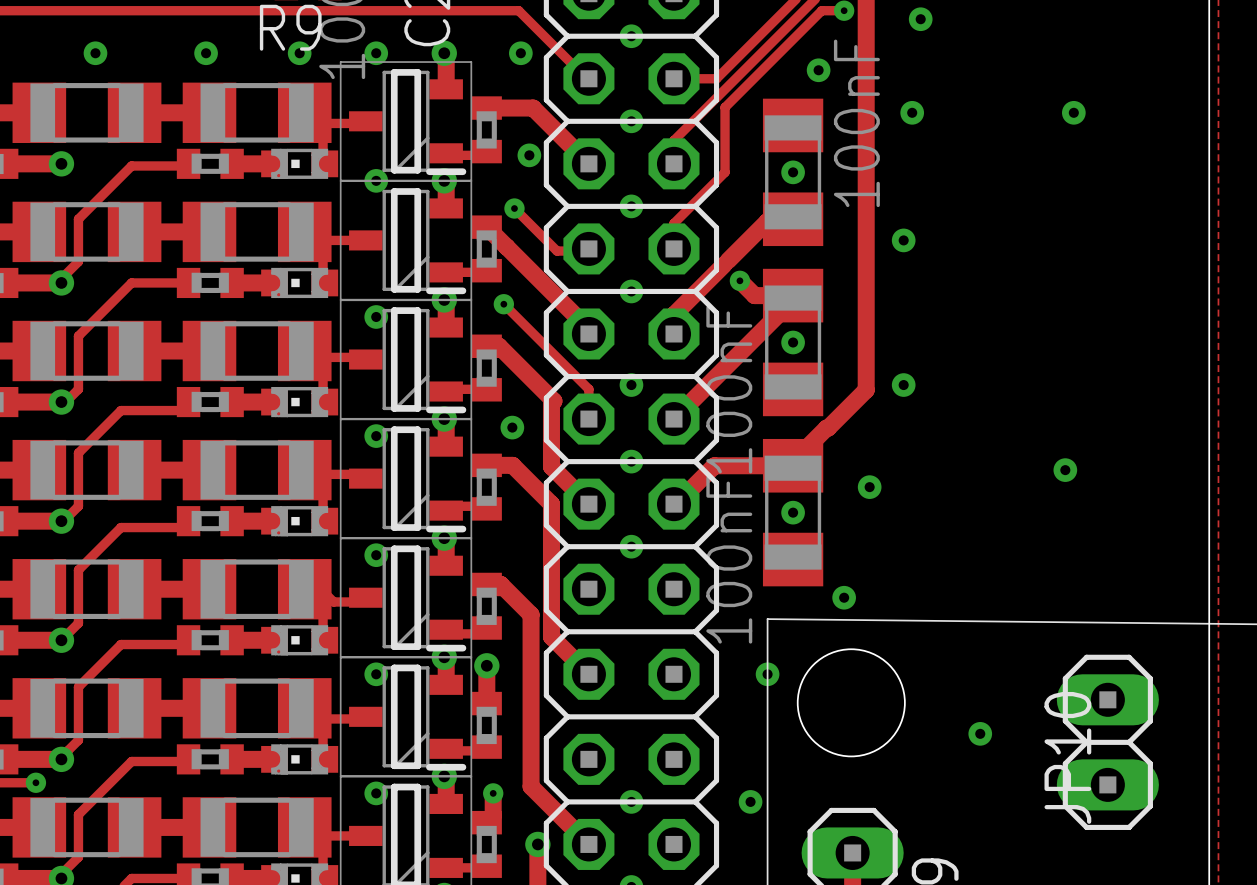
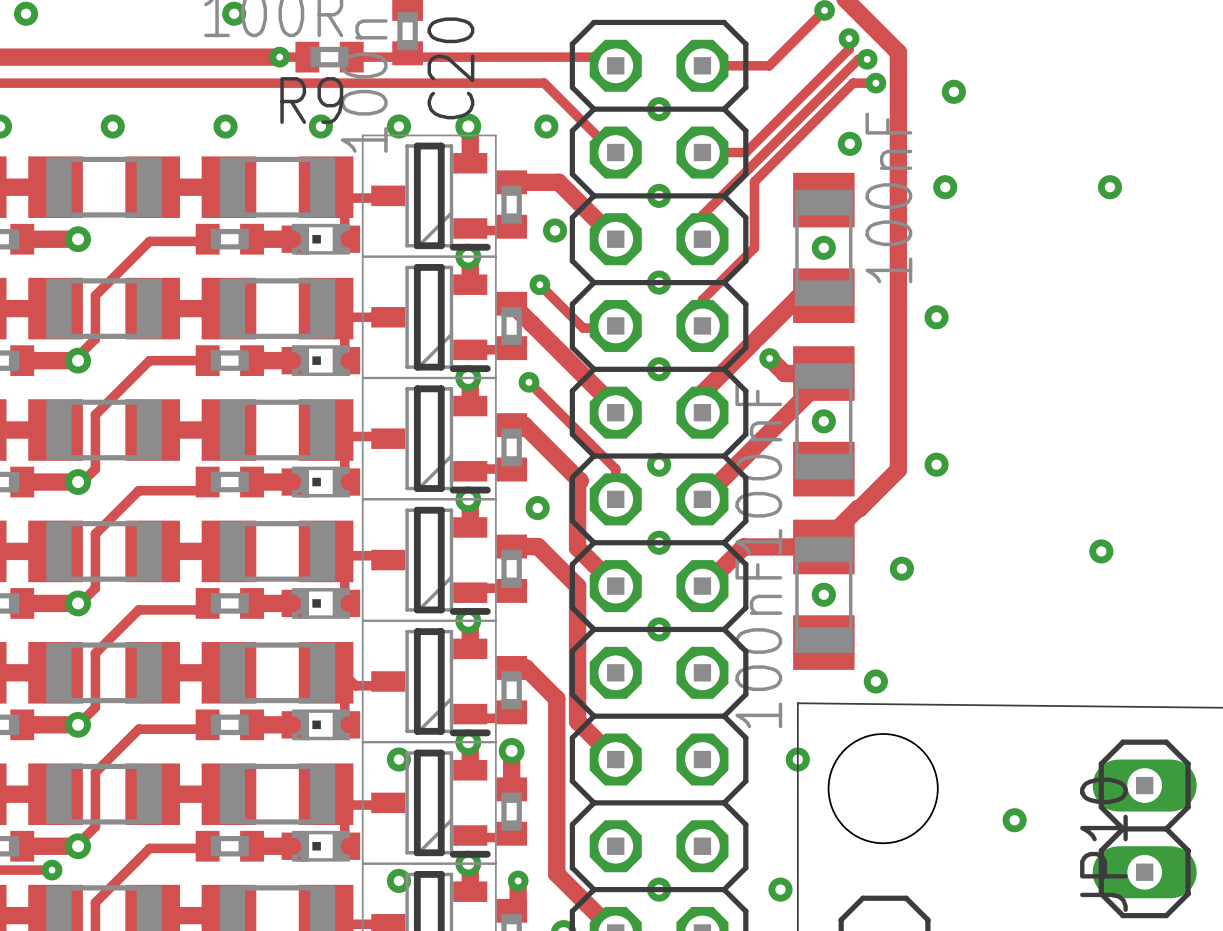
via: (376, 180) -> none
via: (376, 316) -> none
via: (376, 436) -> none
via: (376, 555) -> none

